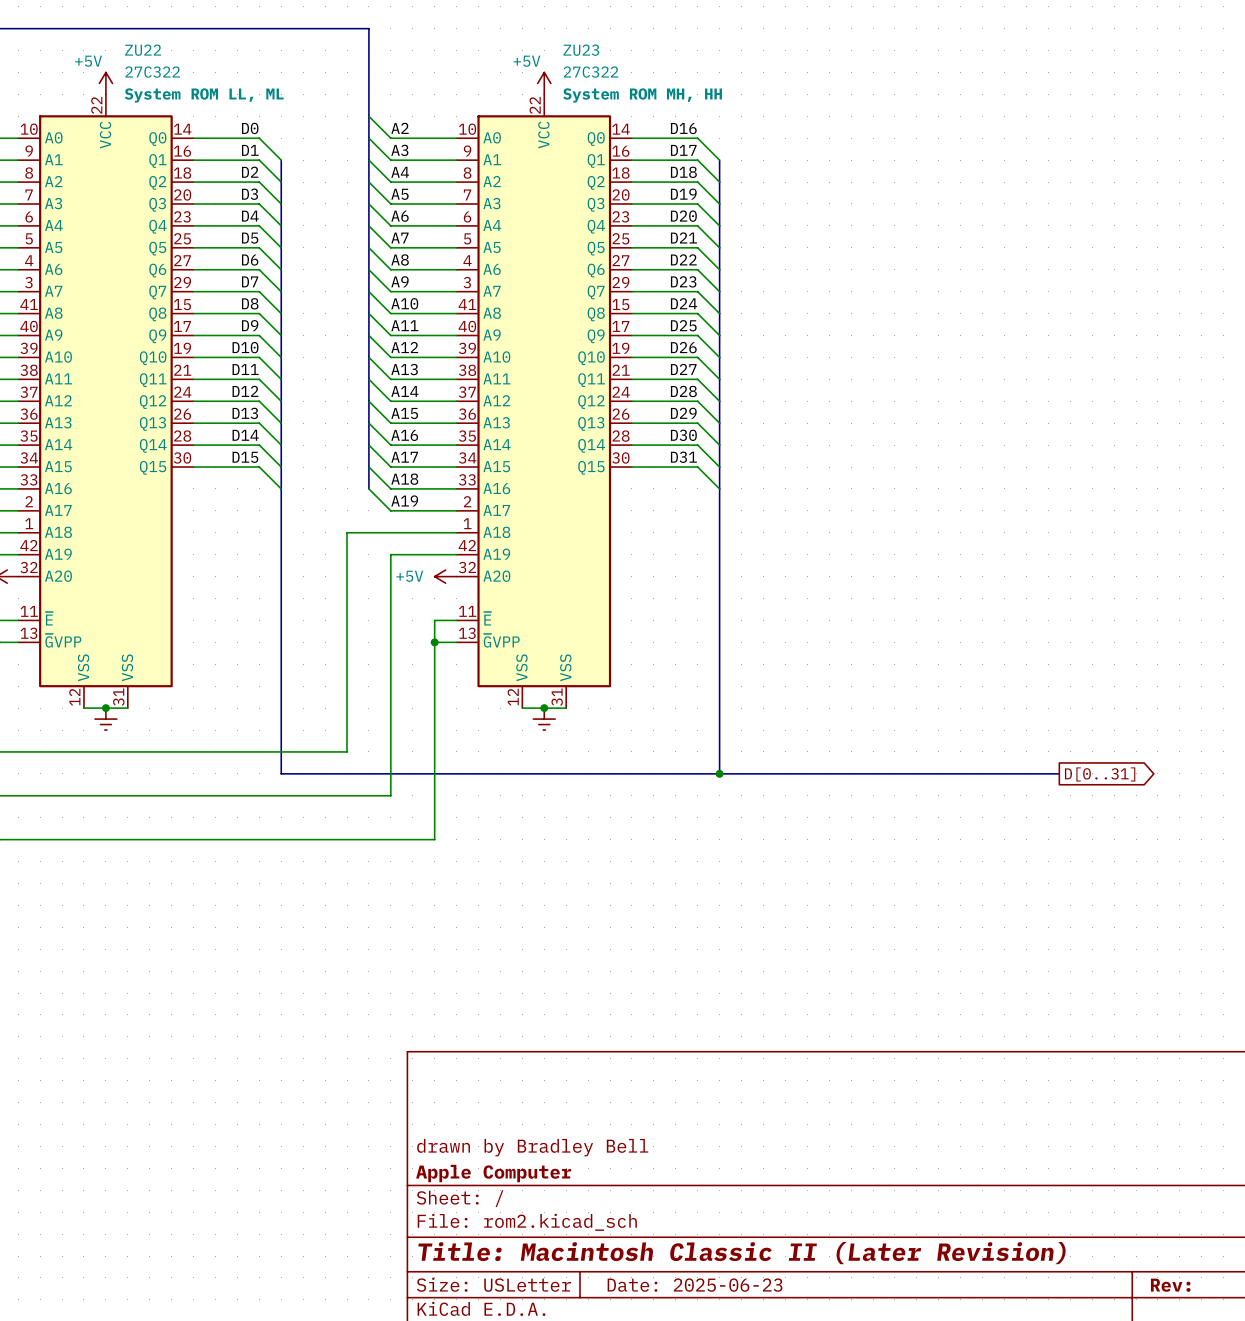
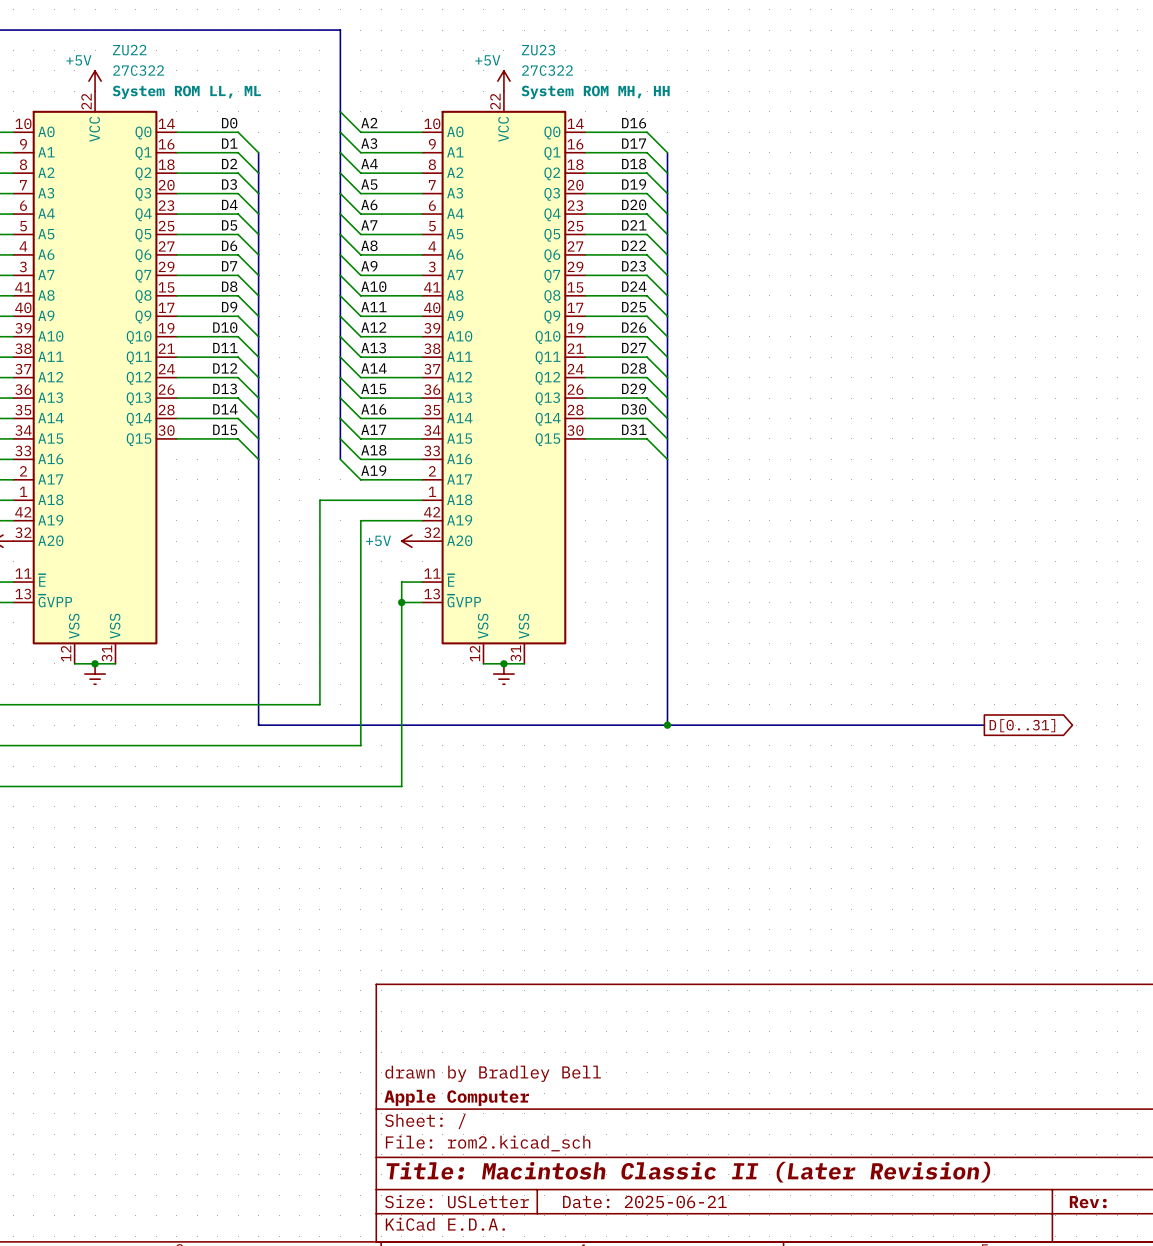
title block: Date: 2025-06-23 (695, 1285) -> Date: 2025-06-21 (644, 1202)

